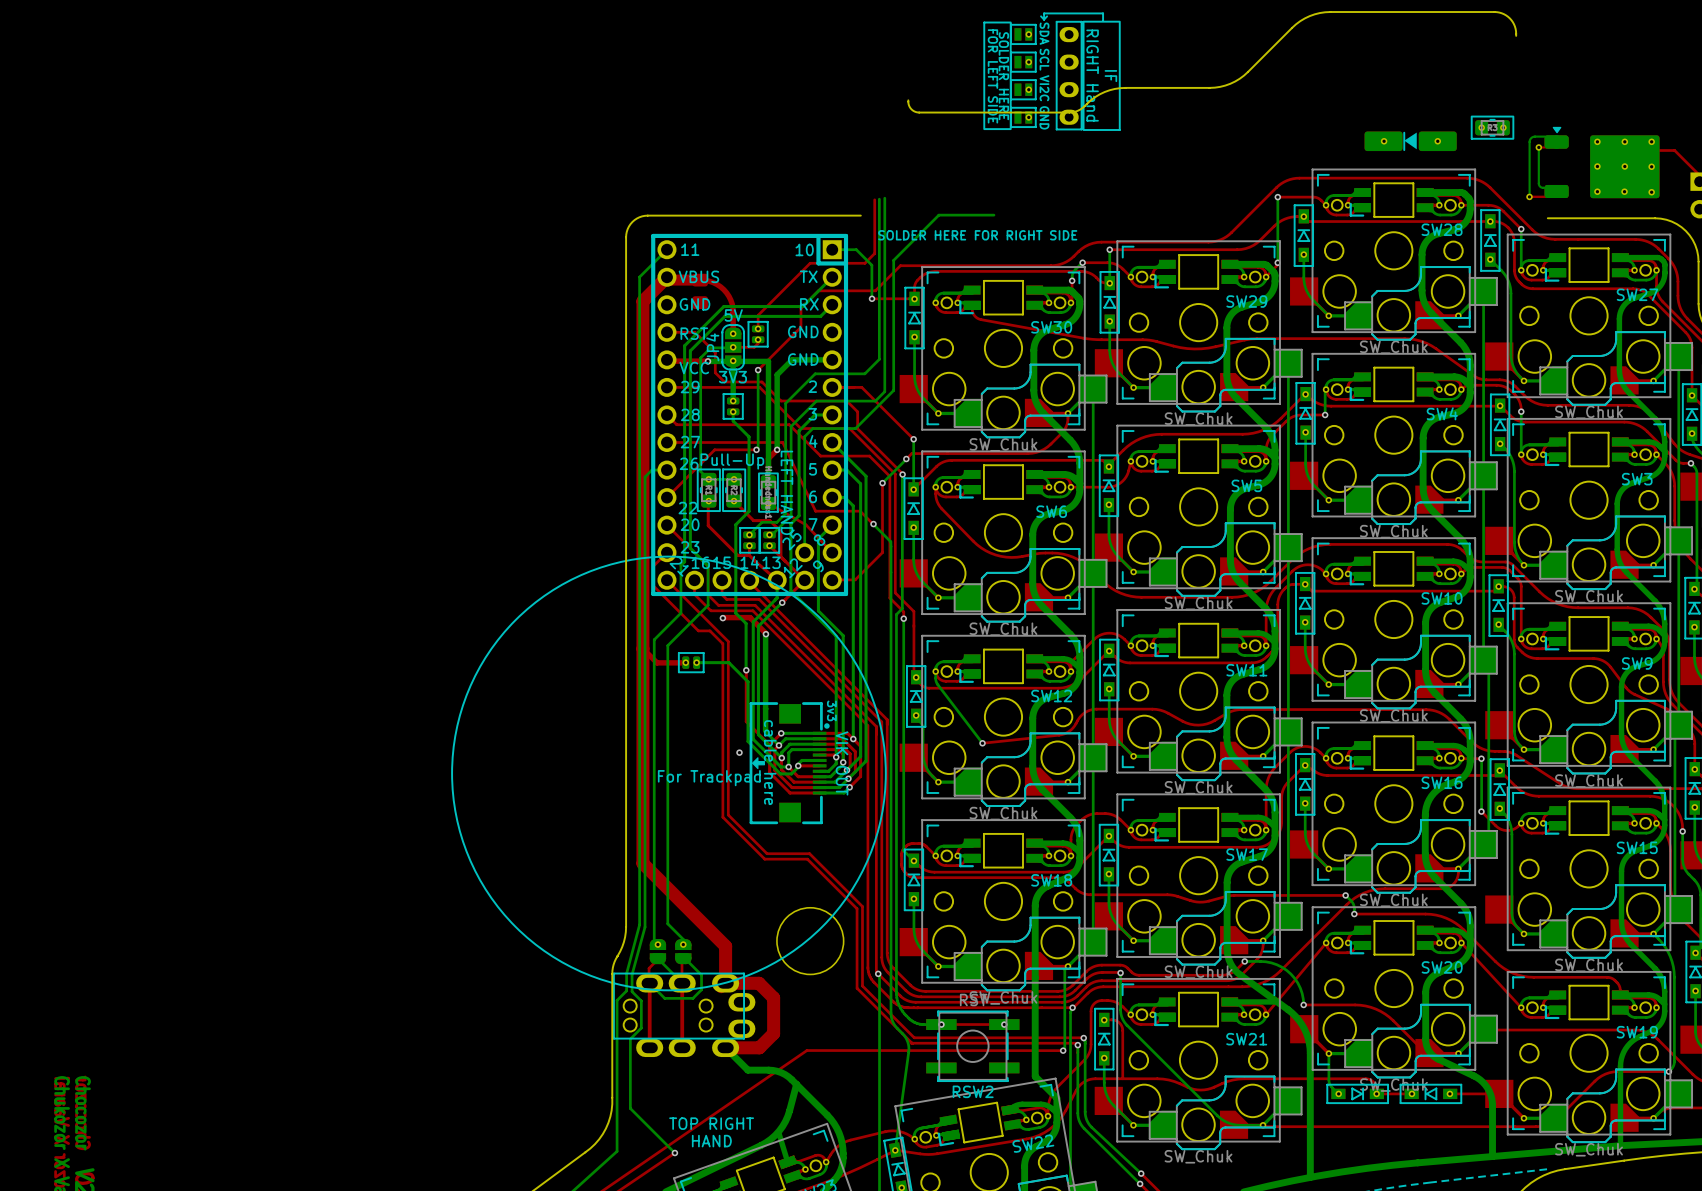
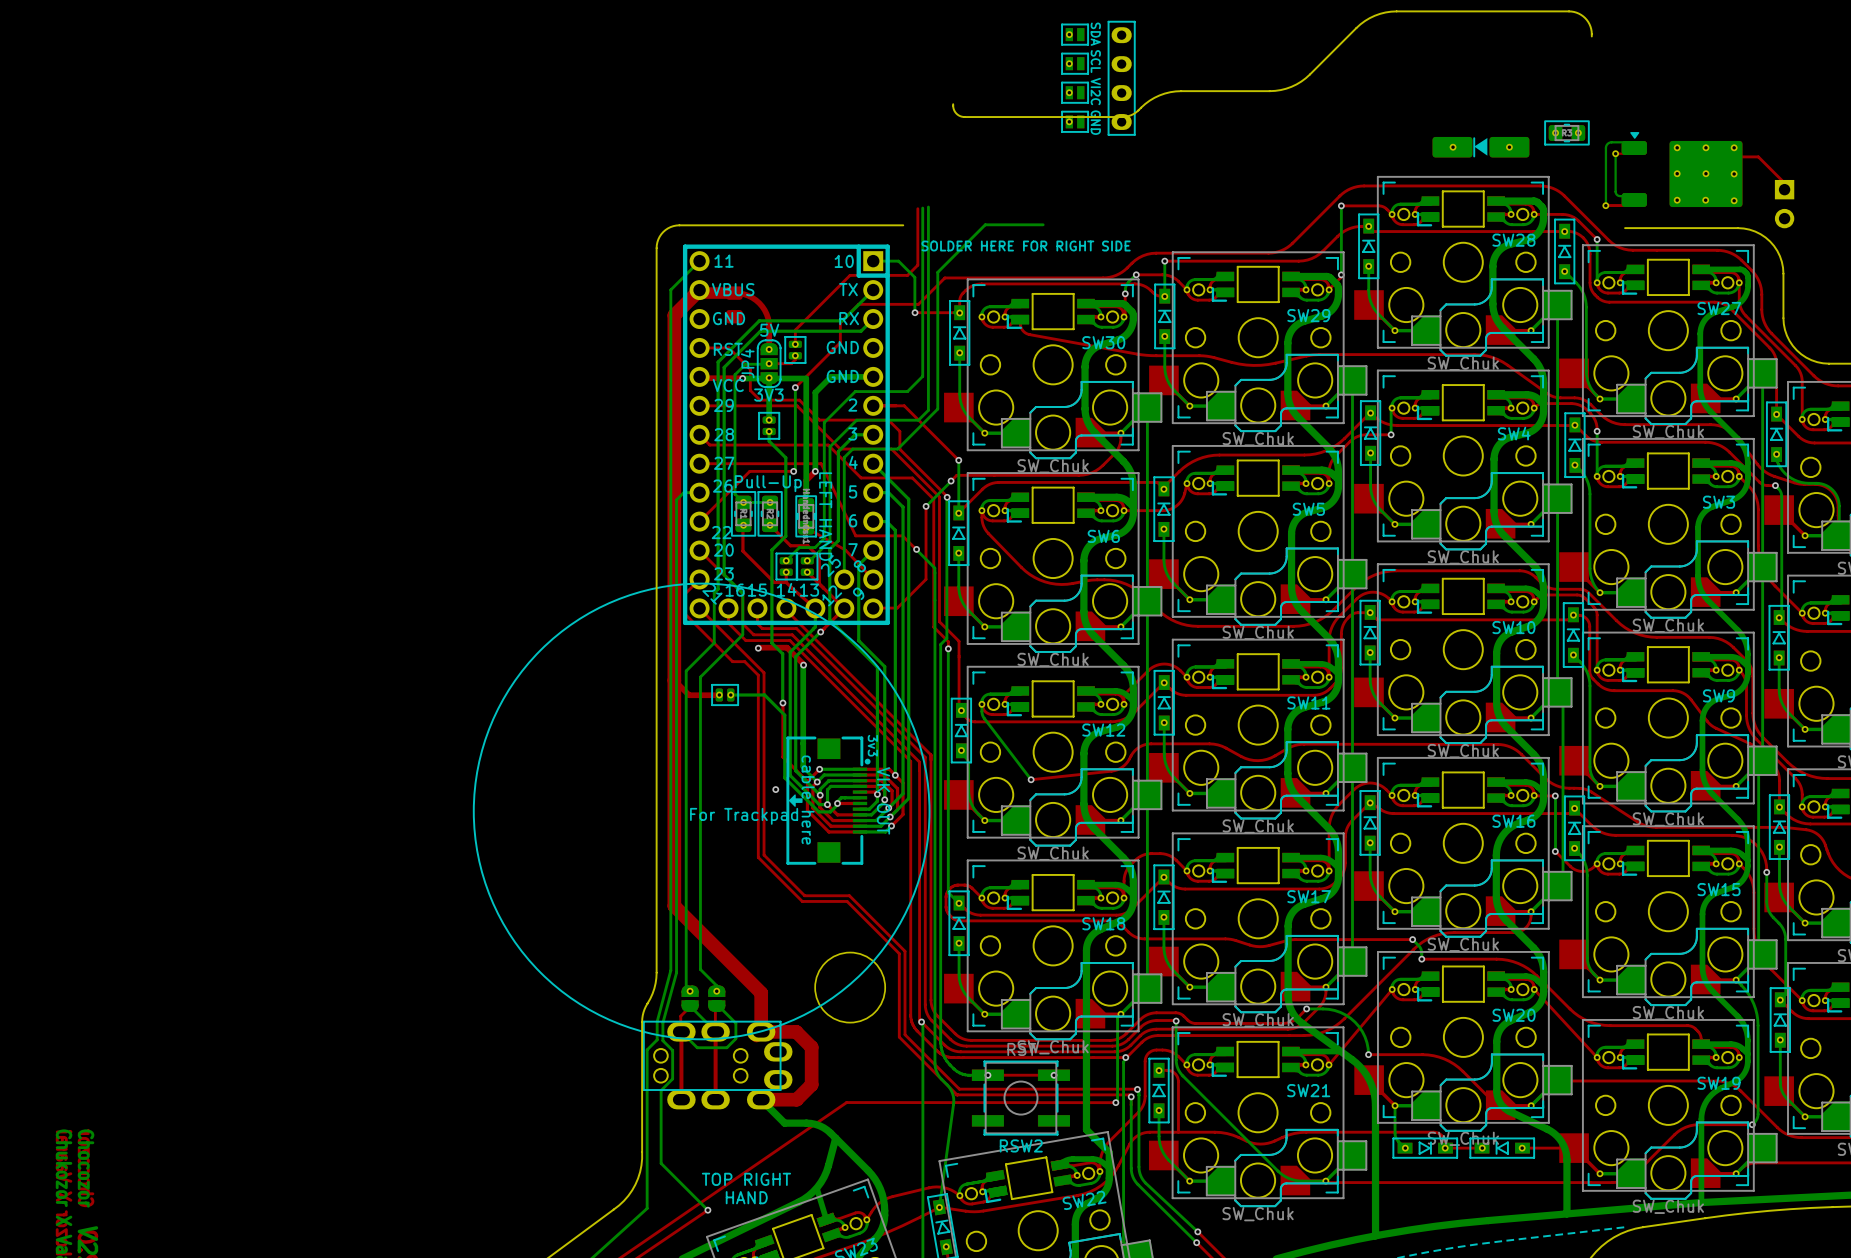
part: (1080, 71) -> none
part: (1010, 75) -> none
part: none -> (1075, 78)
part: none -> (1121, 78)

